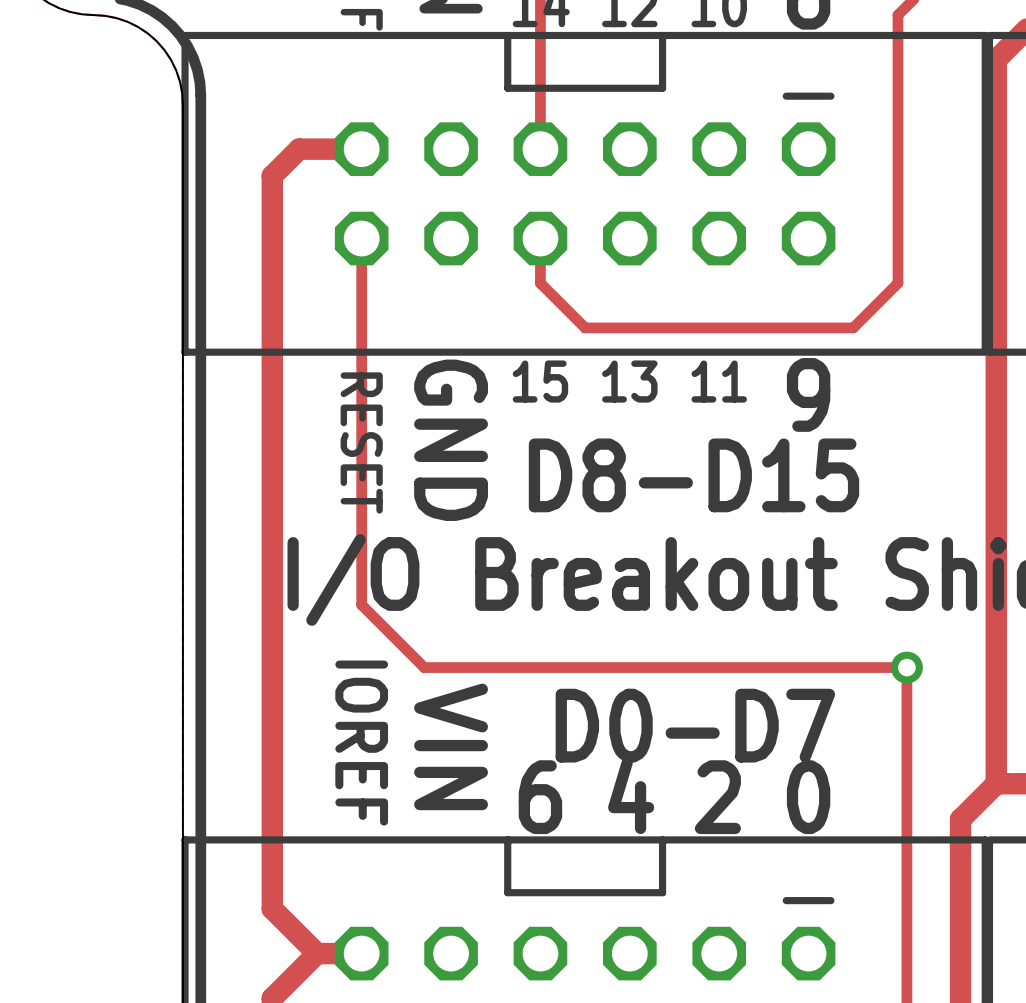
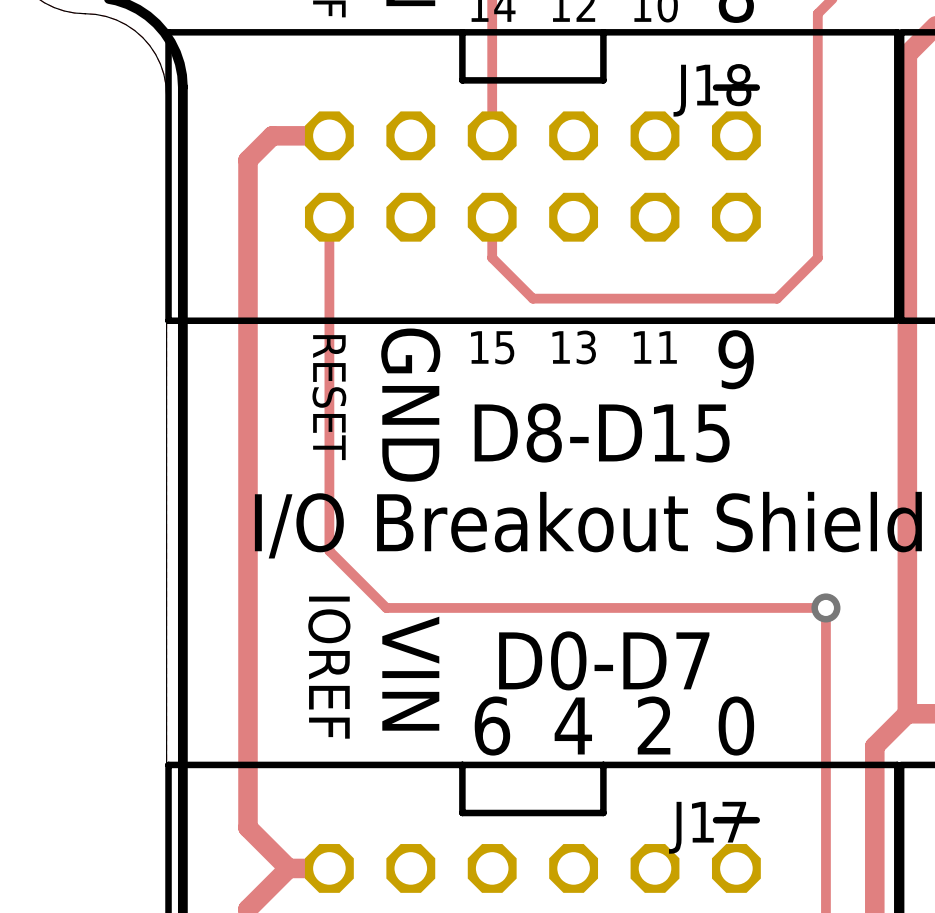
J18 name: none -> J18 (712, 90)
J17 name: none -> J17 (707, 827)

